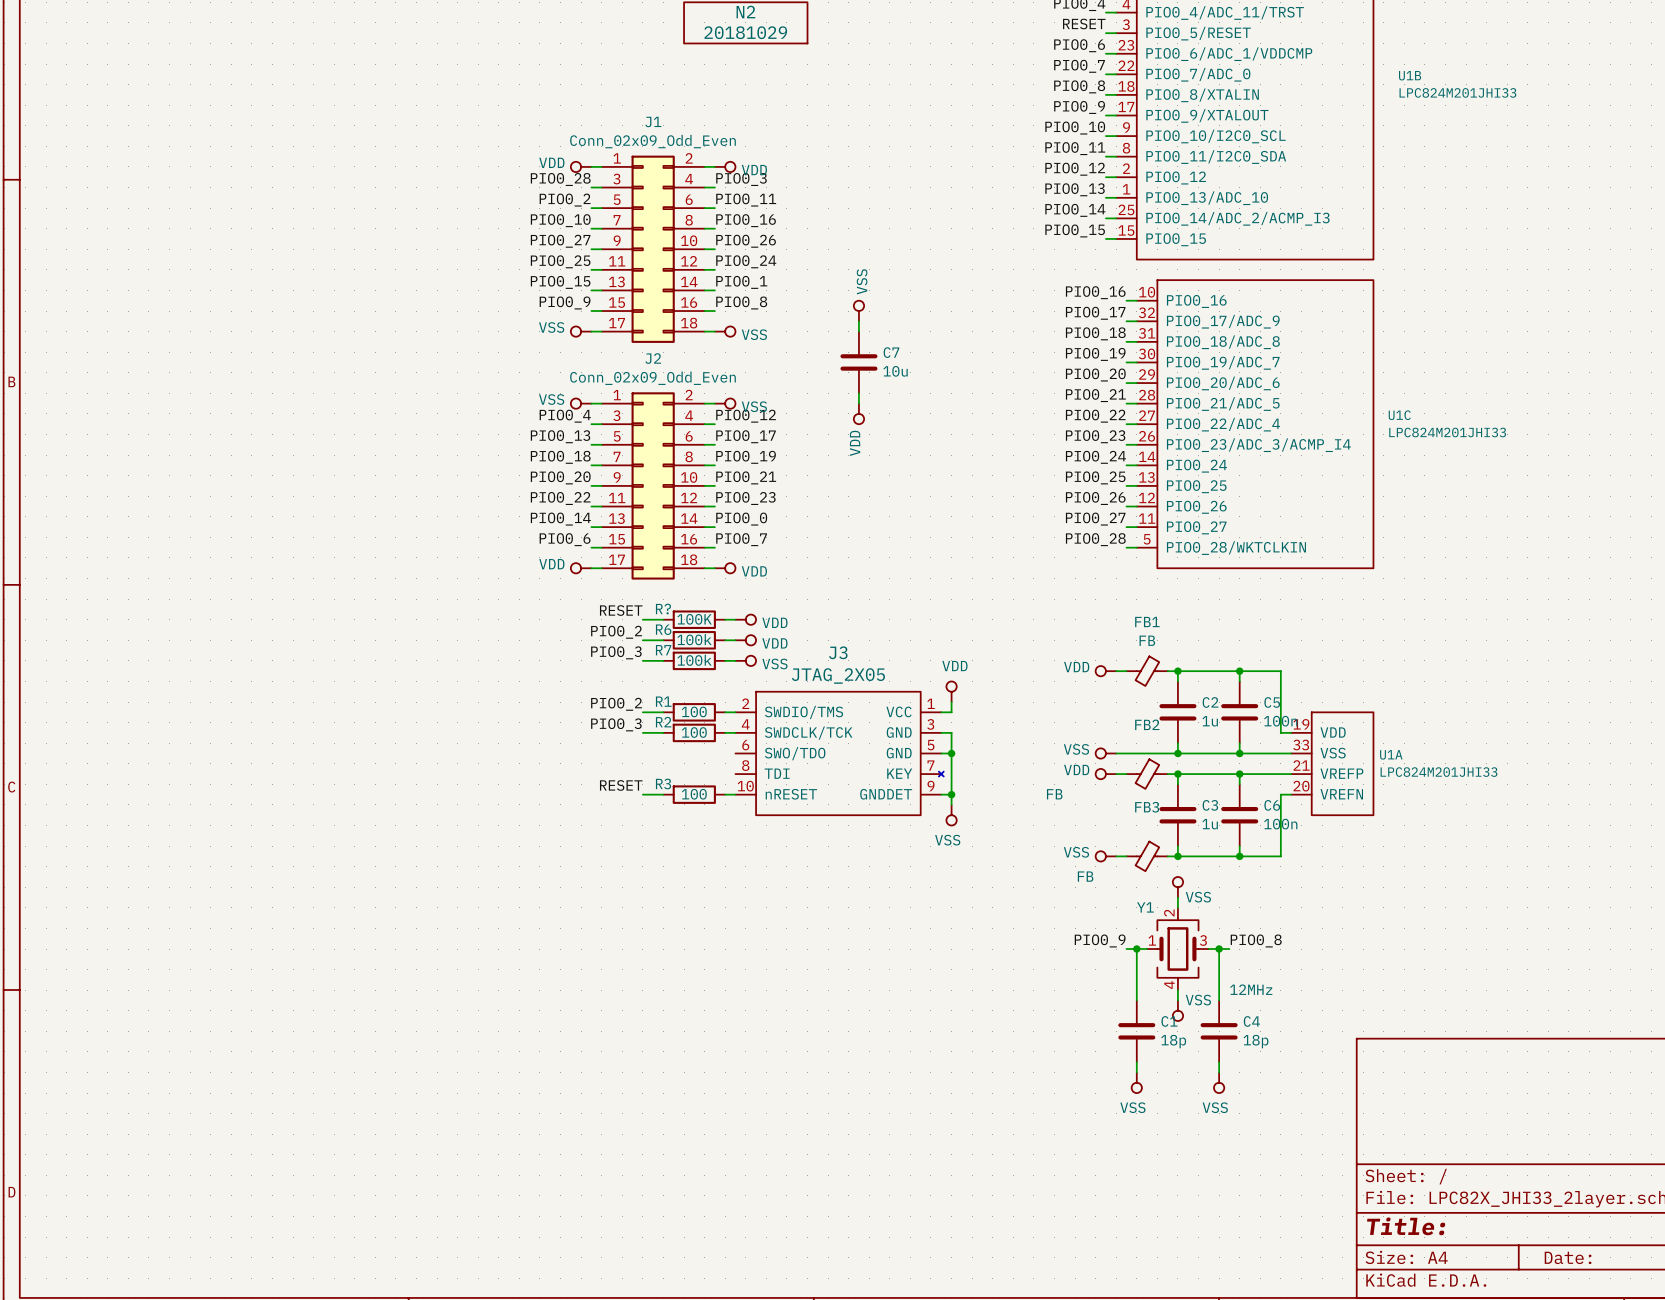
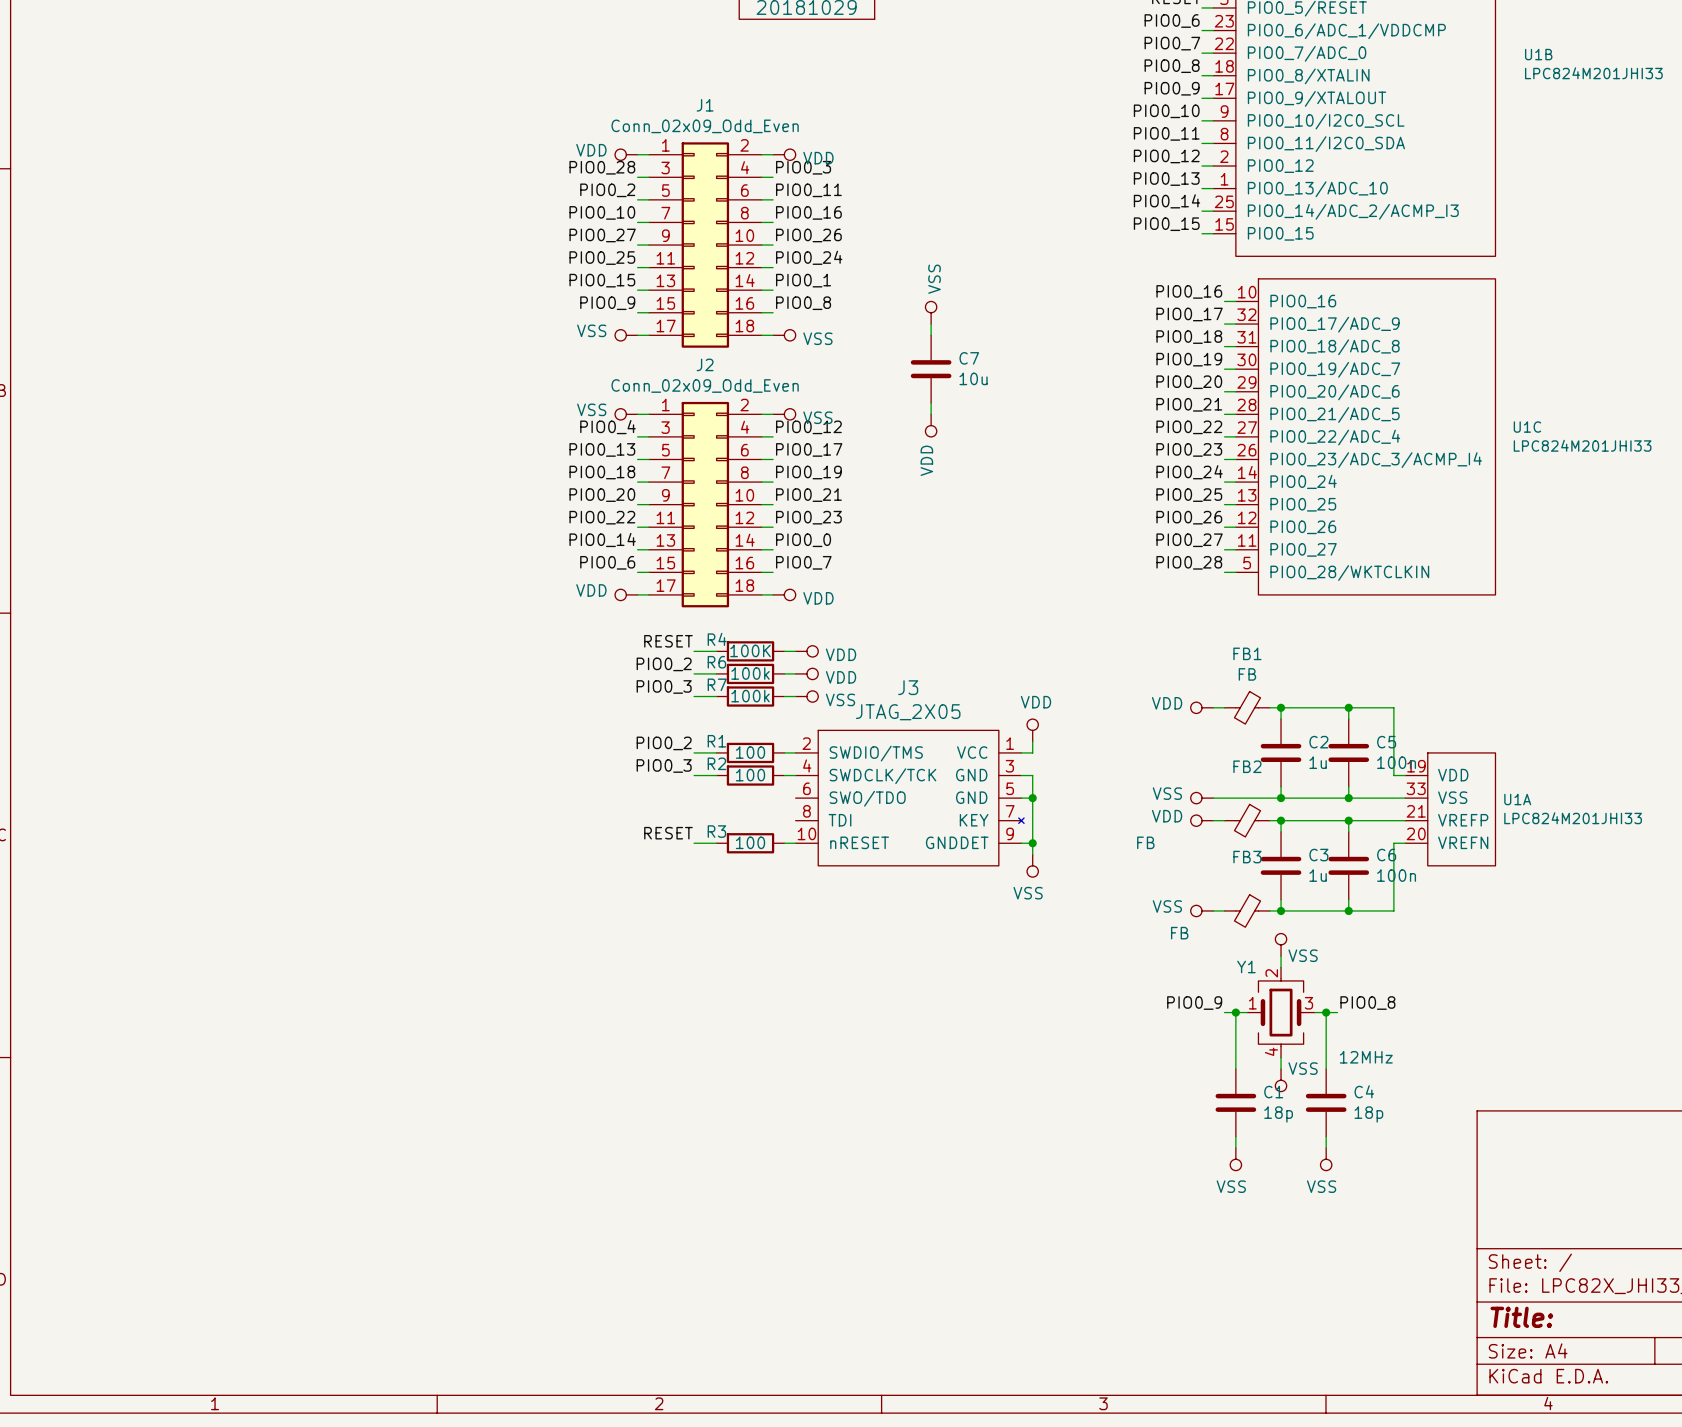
R? name: R? (663, 609) -> R4 (717, 639)

